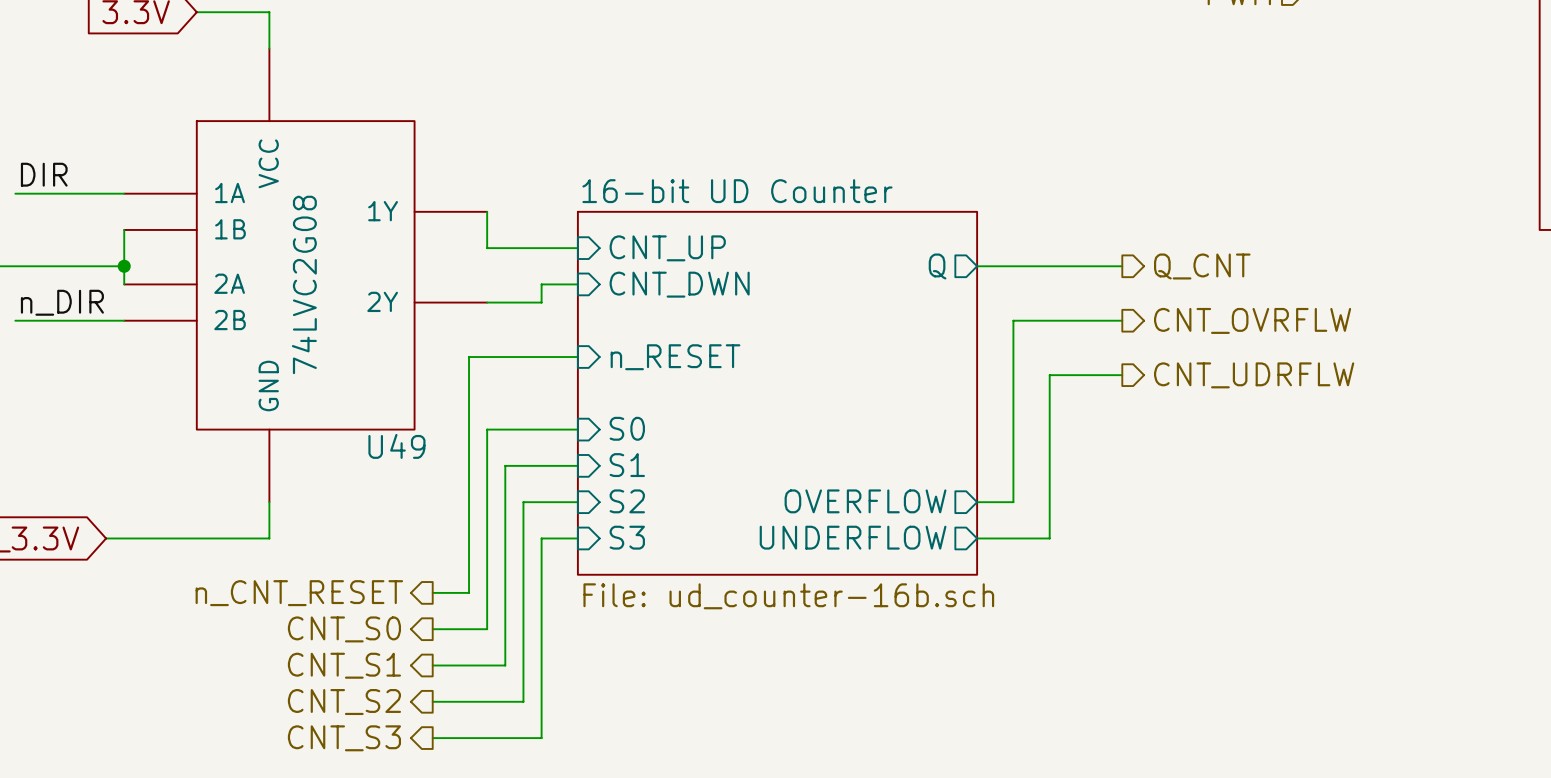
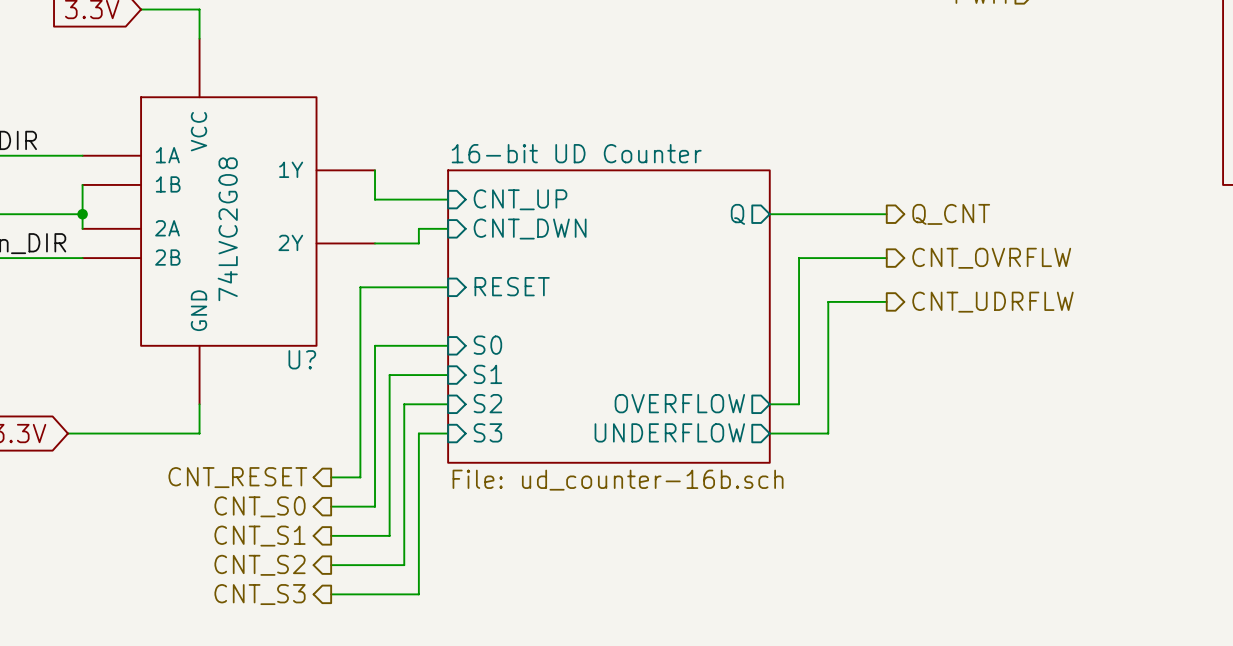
sheet pin: n_RESET (675, 357) -> RESET (512, 286)
U49 name: U49 (396, 446) -> U? (302, 359)
hierarchical label: n_CNT_RESET (299, 593) -> CNT_RESET (237, 477)

